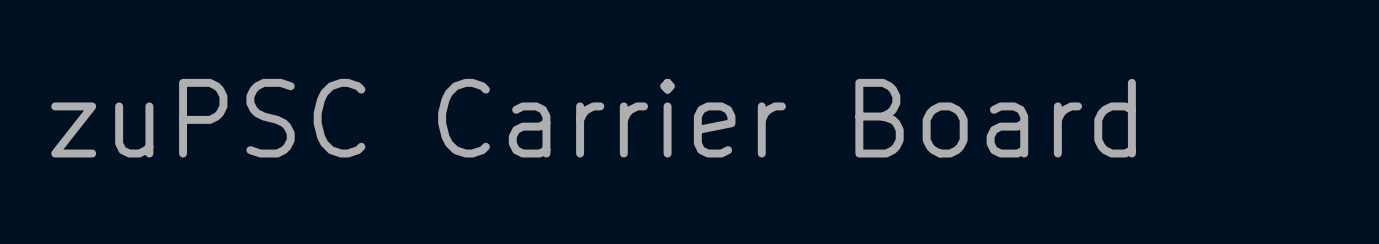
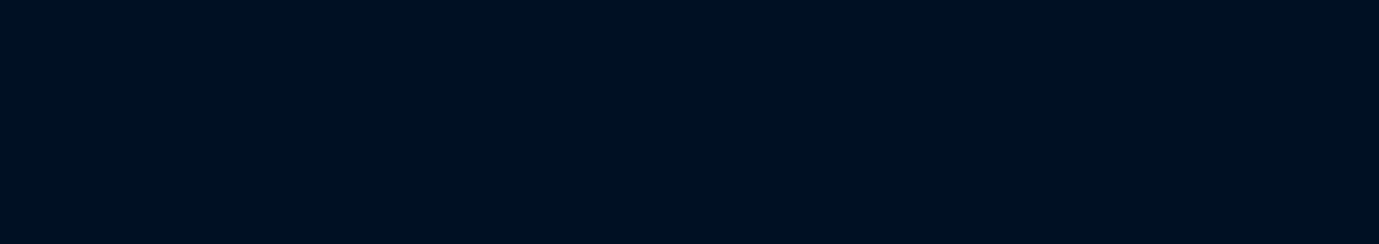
text: zuPSC Carrier Board (593, 118) -> none

